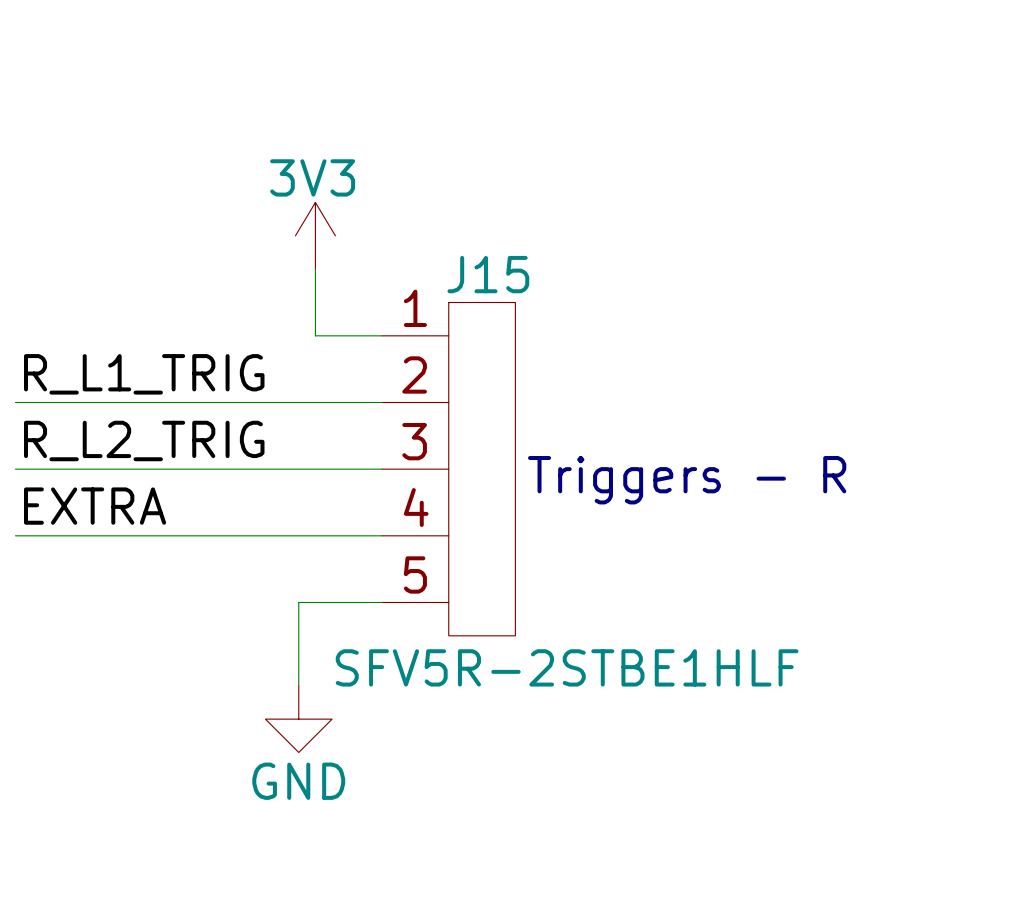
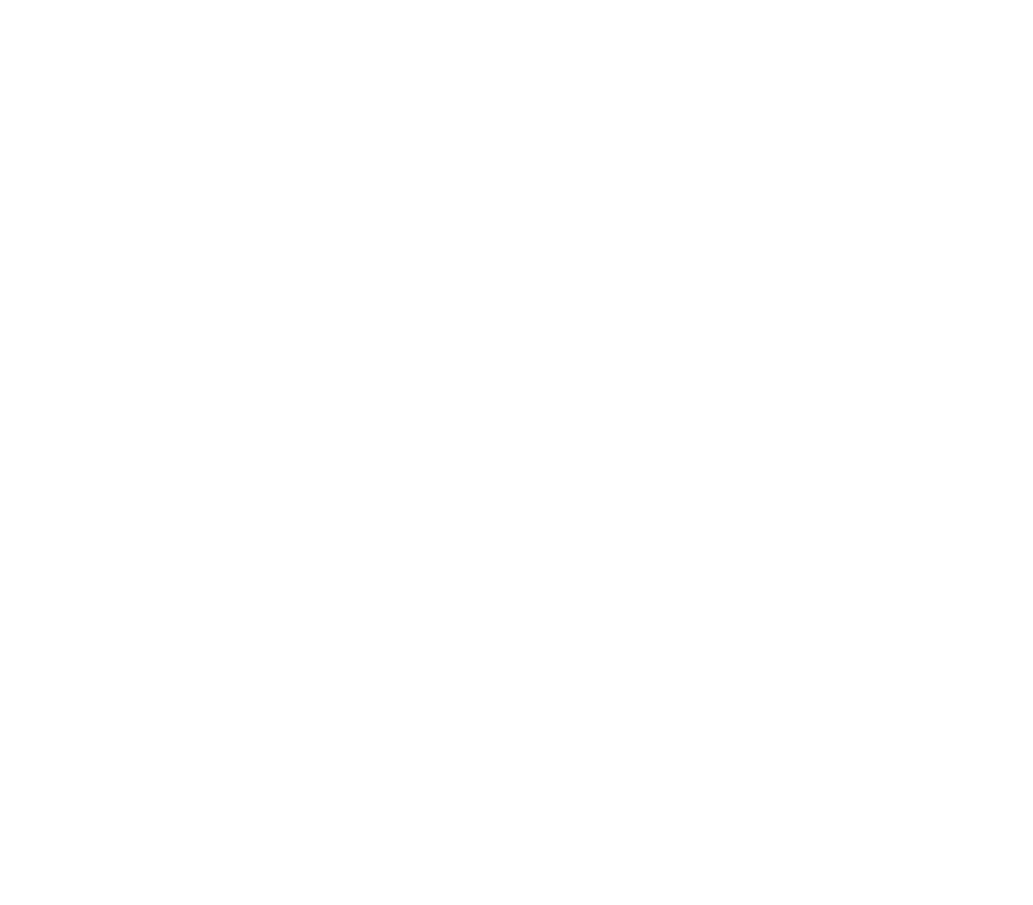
power symbol: 3V3 (315, 235) -> none
wire: (315, 269) (315, 335) (382, 335) -> none
label: R_L1_TRIG (144, 374) -> none
wire: (15, 402) (382, 402) -> none
label: R_L2_TRIG (144, 440) -> none
wire: (15, 469) (382, 469) -> none
J15: SFV5R-2STBE1HLF (448, 469) -> none
text: Triggers - R (687, 480) -> none
label: EXTRA (95, 506) -> none
wire: (15, 535) (382, 535) -> none
wire: (382, 602) (298, 602) (298, 685) -> none
power symbol: GND (298, 719) -> none

